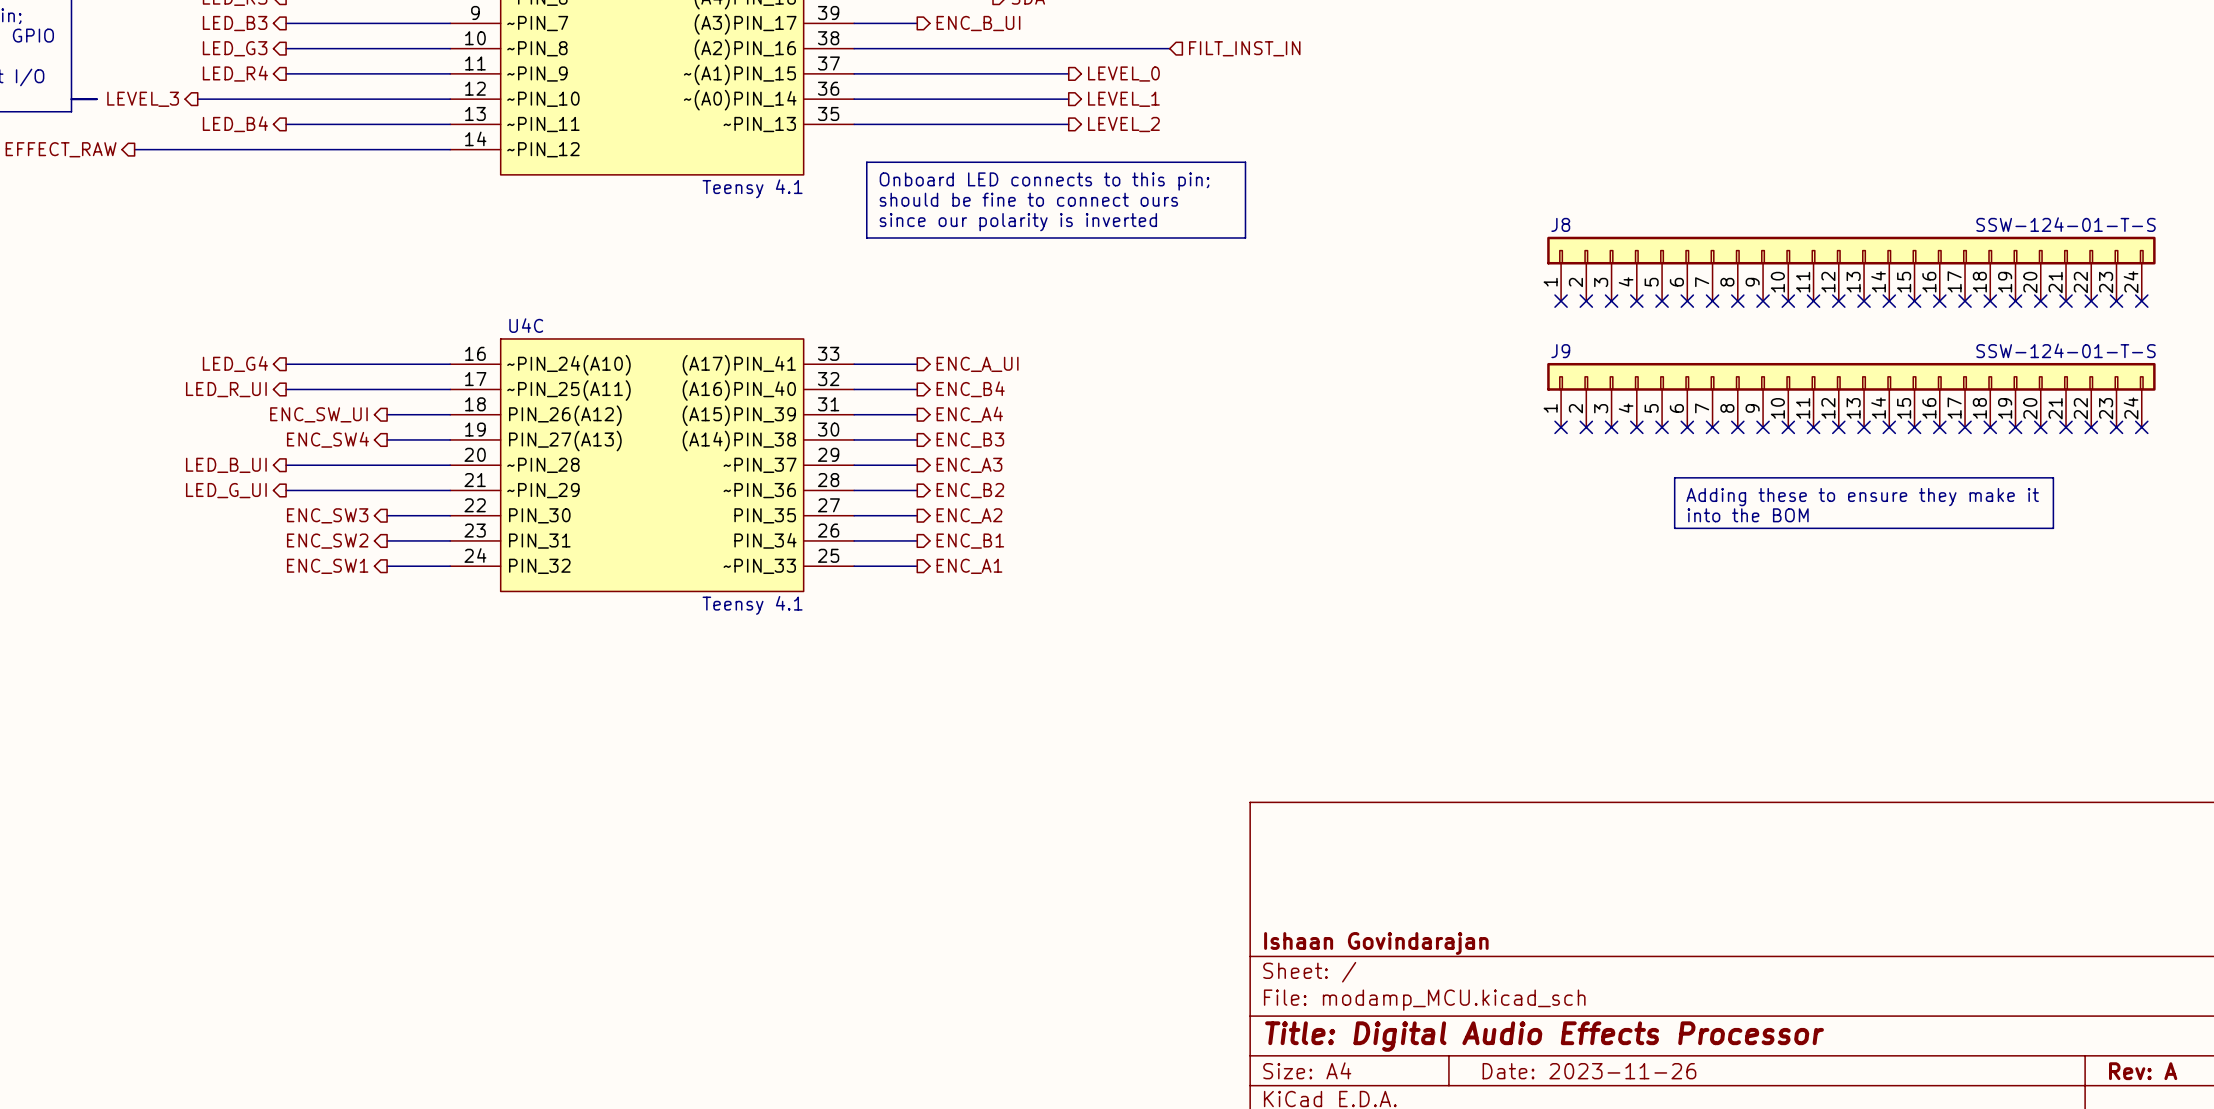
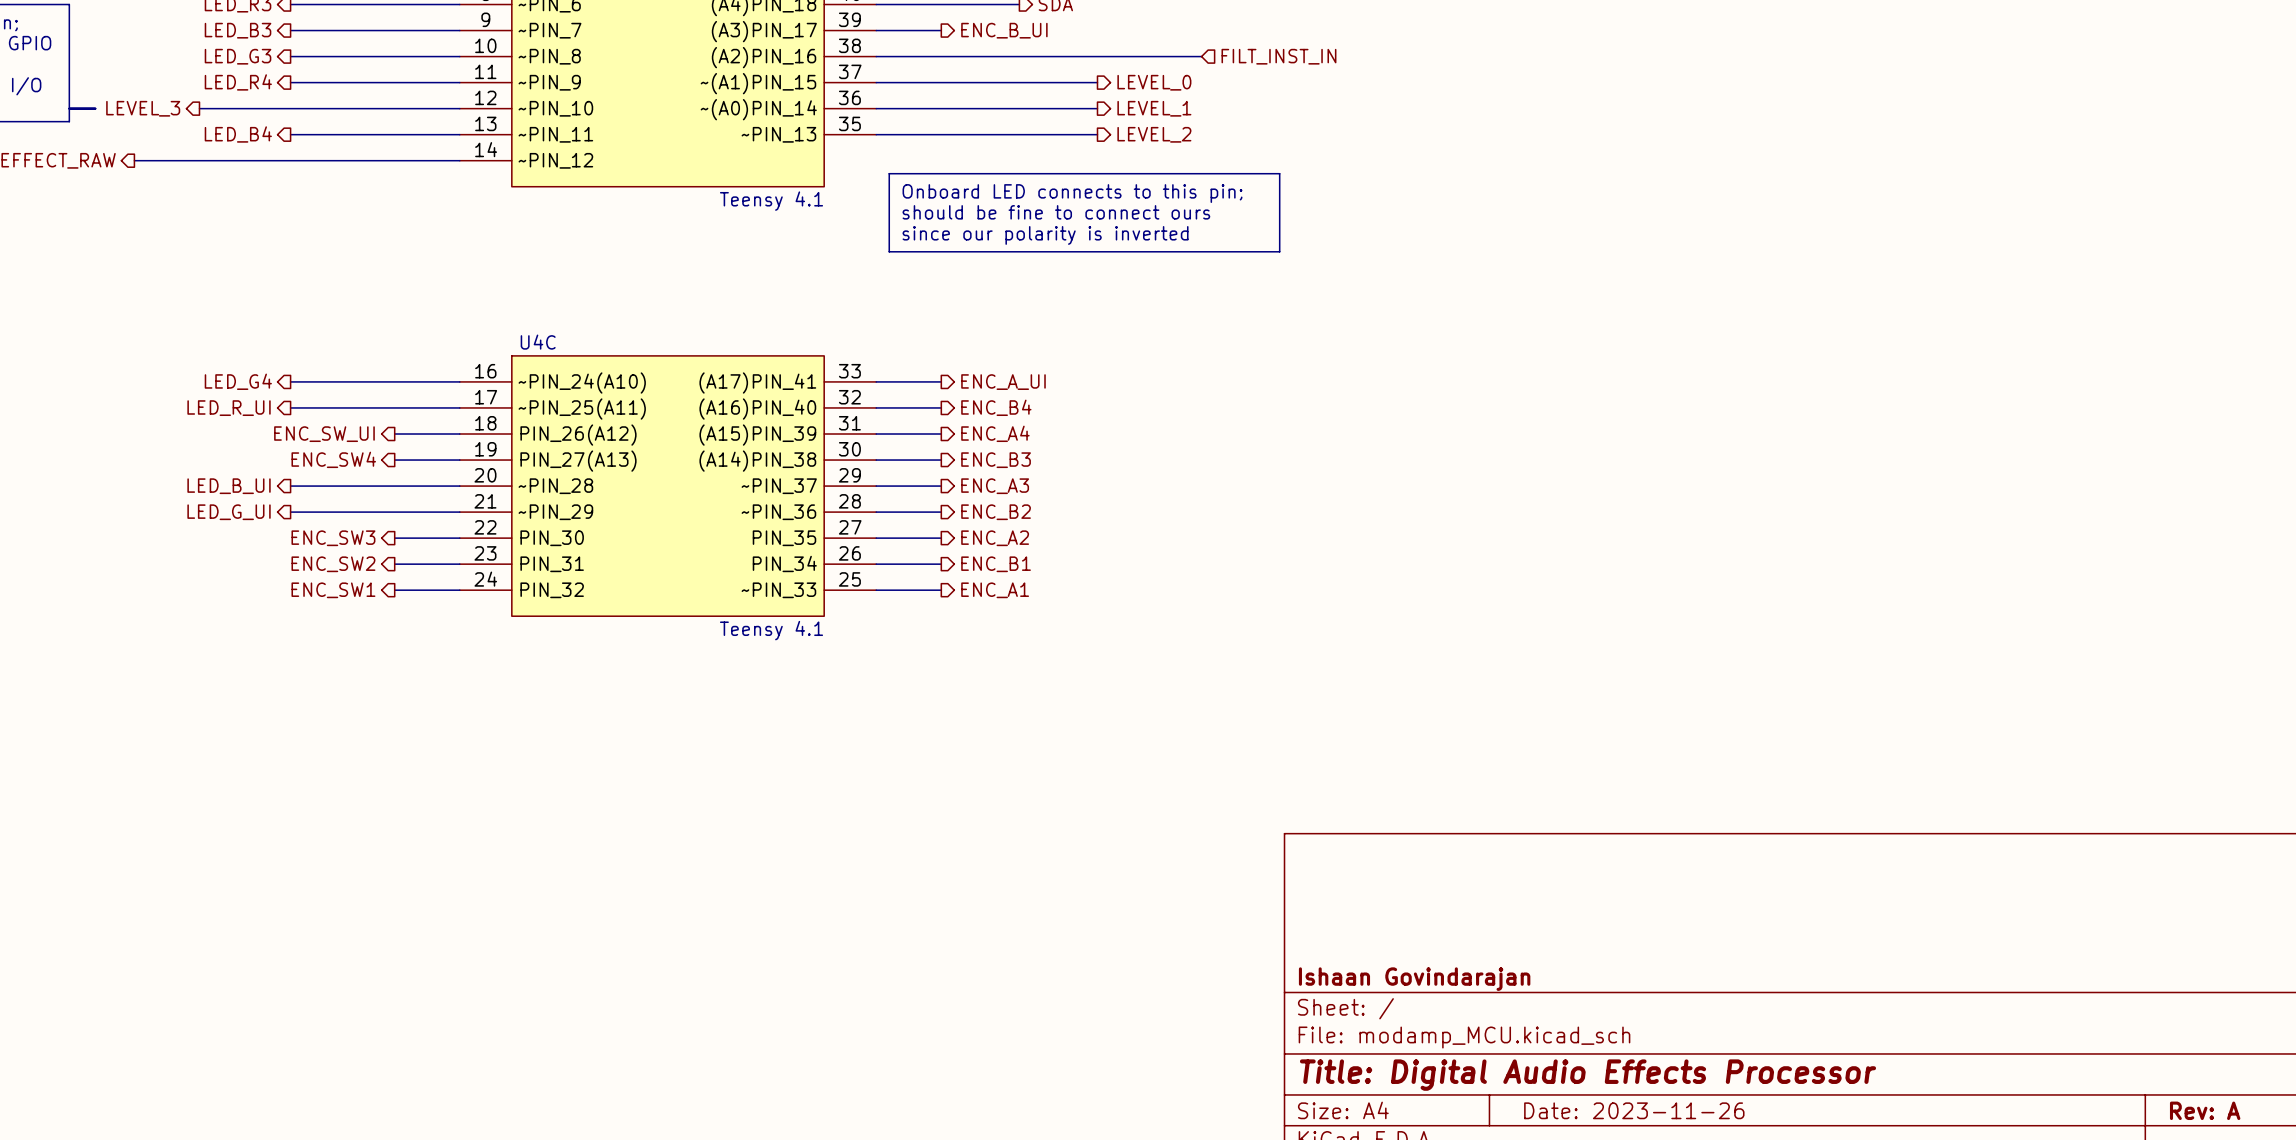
J8: SSW-124-01-T-S (1851, 268) -> none
no-connect mark: (1561, 301) -> none
no-connect mark: (1586, 301) -> none
no-connect mark: (1611, 301) -> none
no-connect mark: (1636, 301) -> none
no-connect mark: (1662, 301) -> none
no-connect mark: (1687, 301) -> none
no-connect mark: (1712, 301) -> none
no-connect mark: (1737, 301) -> none
no-connect mark: (1763, 301) -> none
no-connect mark: (1788, 301) -> none
no-connect mark: (1813, 301) -> none
no-connect mark: (1838, 301) -> none
no-connect mark: (1864, 301) -> none
no-connect mark: (1889, 301) -> none
no-connect mark: (1914, 301) -> none
no-connect mark: (1939, 301) -> none
no-connect mark: (1965, 301) -> none
no-connect mark: (1990, 301) -> none
no-connect mark: (2015, 301) -> none
no-connect mark: (2040, 301) -> none
no-connect mark: (2066, 301) -> none
no-connect mark: (2091, 301) -> none
no-connect mark: (2116, 301) -> none
no-connect mark: (2141, 301) -> none
J9: SSW-124-01-T-S (1851, 395) -> none
no-connect mark: (1561, 427) -> none
no-connect mark: (1586, 427) -> none
no-connect mark: (1611, 427) -> none
no-connect mark: (1636, 427) -> none
no-connect mark: (1662, 427) -> none
no-connect mark: (1687, 427) -> none
no-connect mark: (1712, 427) -> none
no-connect mark: (1737, 427) -> none
no-connect mark: (1763, 427) -> none
no-connect mark: (1788, 427) -> none
no-connect mark: (1813, 427) -> none
no-connect mark: (1838, 427) -> none
no-connect mark: (1864, 427) -> none
no-connect mark: (1889, 427) -> none
no-connect mark: (1914, 427) -> none
no-connect mark: (1939, 427) -> none
no-connect mark: (1965, 427) -> none
no-connect mark: (1990, 427) -> none
no-connect mark: (2015, 427) -> none
no-connect mark: (2040, 427) -> none
no-connect mark: (2066, 427) -> none
no-connect mark: (2091, 427) -> none
no-connect mark: (2116, 427) -> none
no-connect mark: (2141, 427) -> none
line: (1674, 477) (2053, 477) (2053, 528) (1674, 528) (1674, 477) -> none
text: Adding these to ensure they make it (1862, 497) -> none
text: into the BOM (1748, 515) -> none

